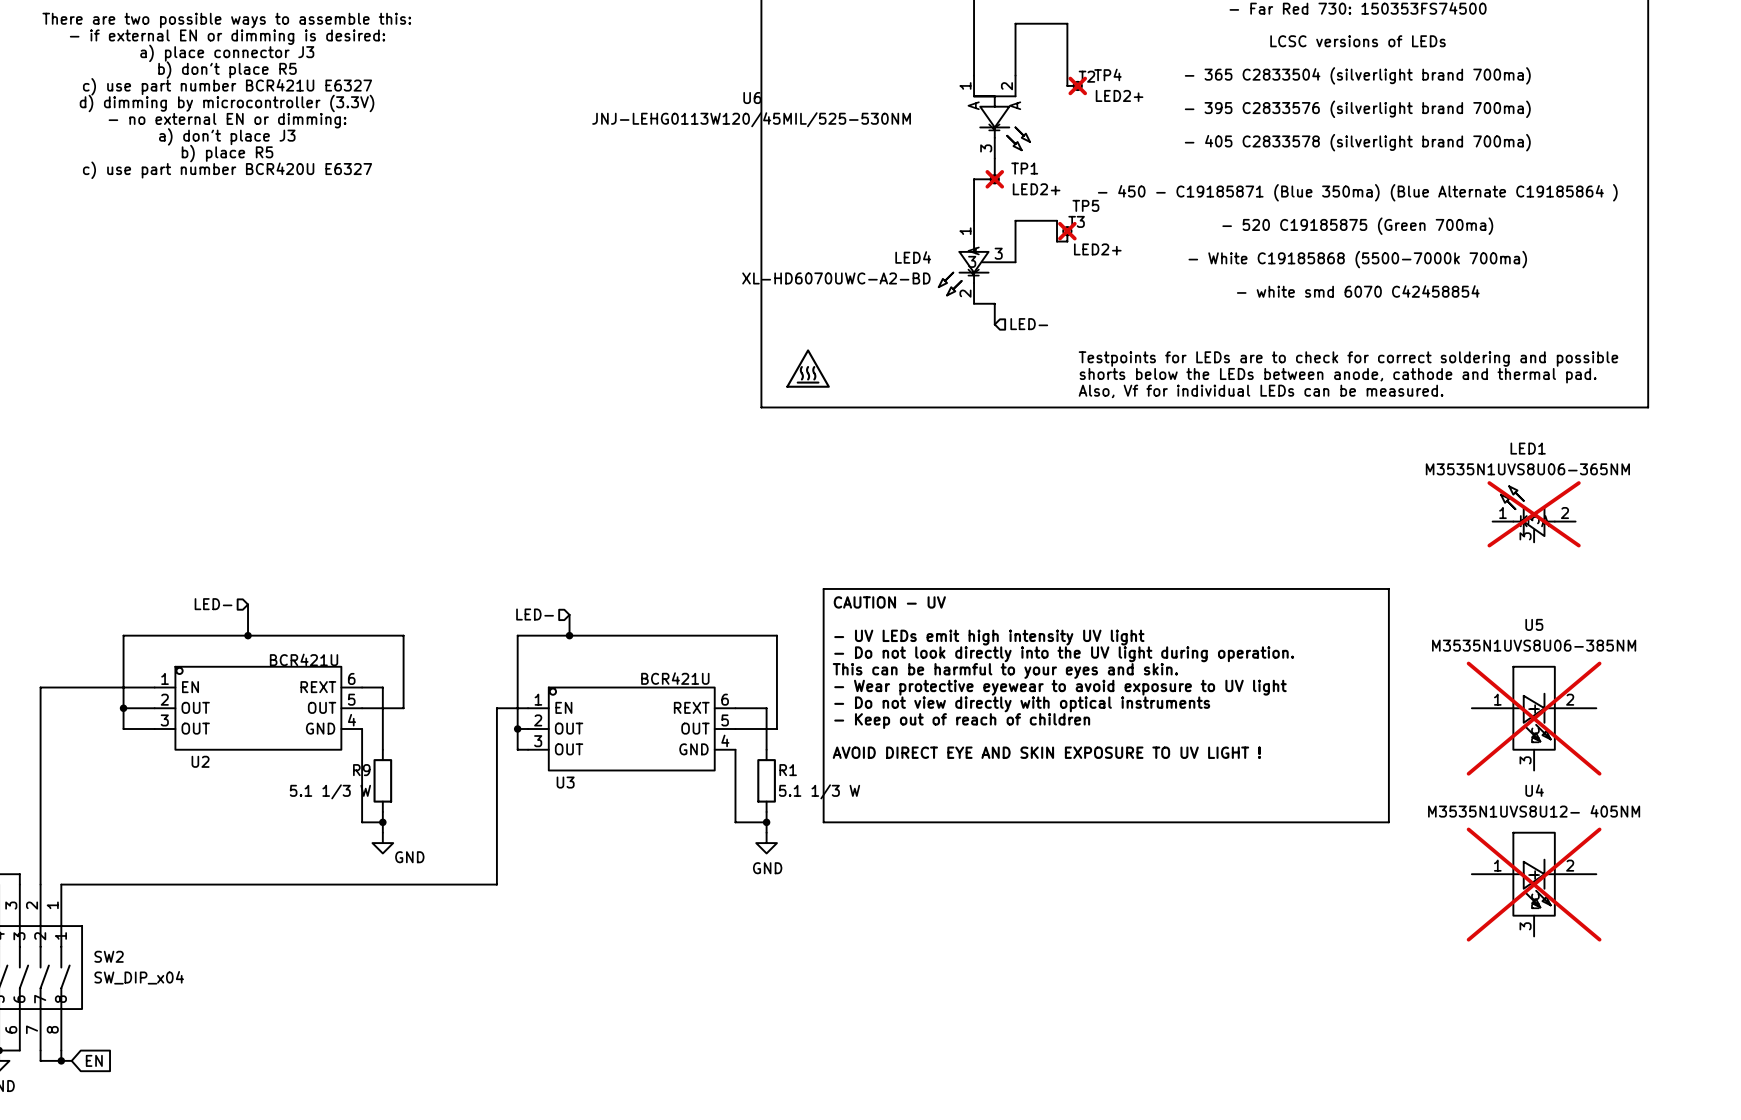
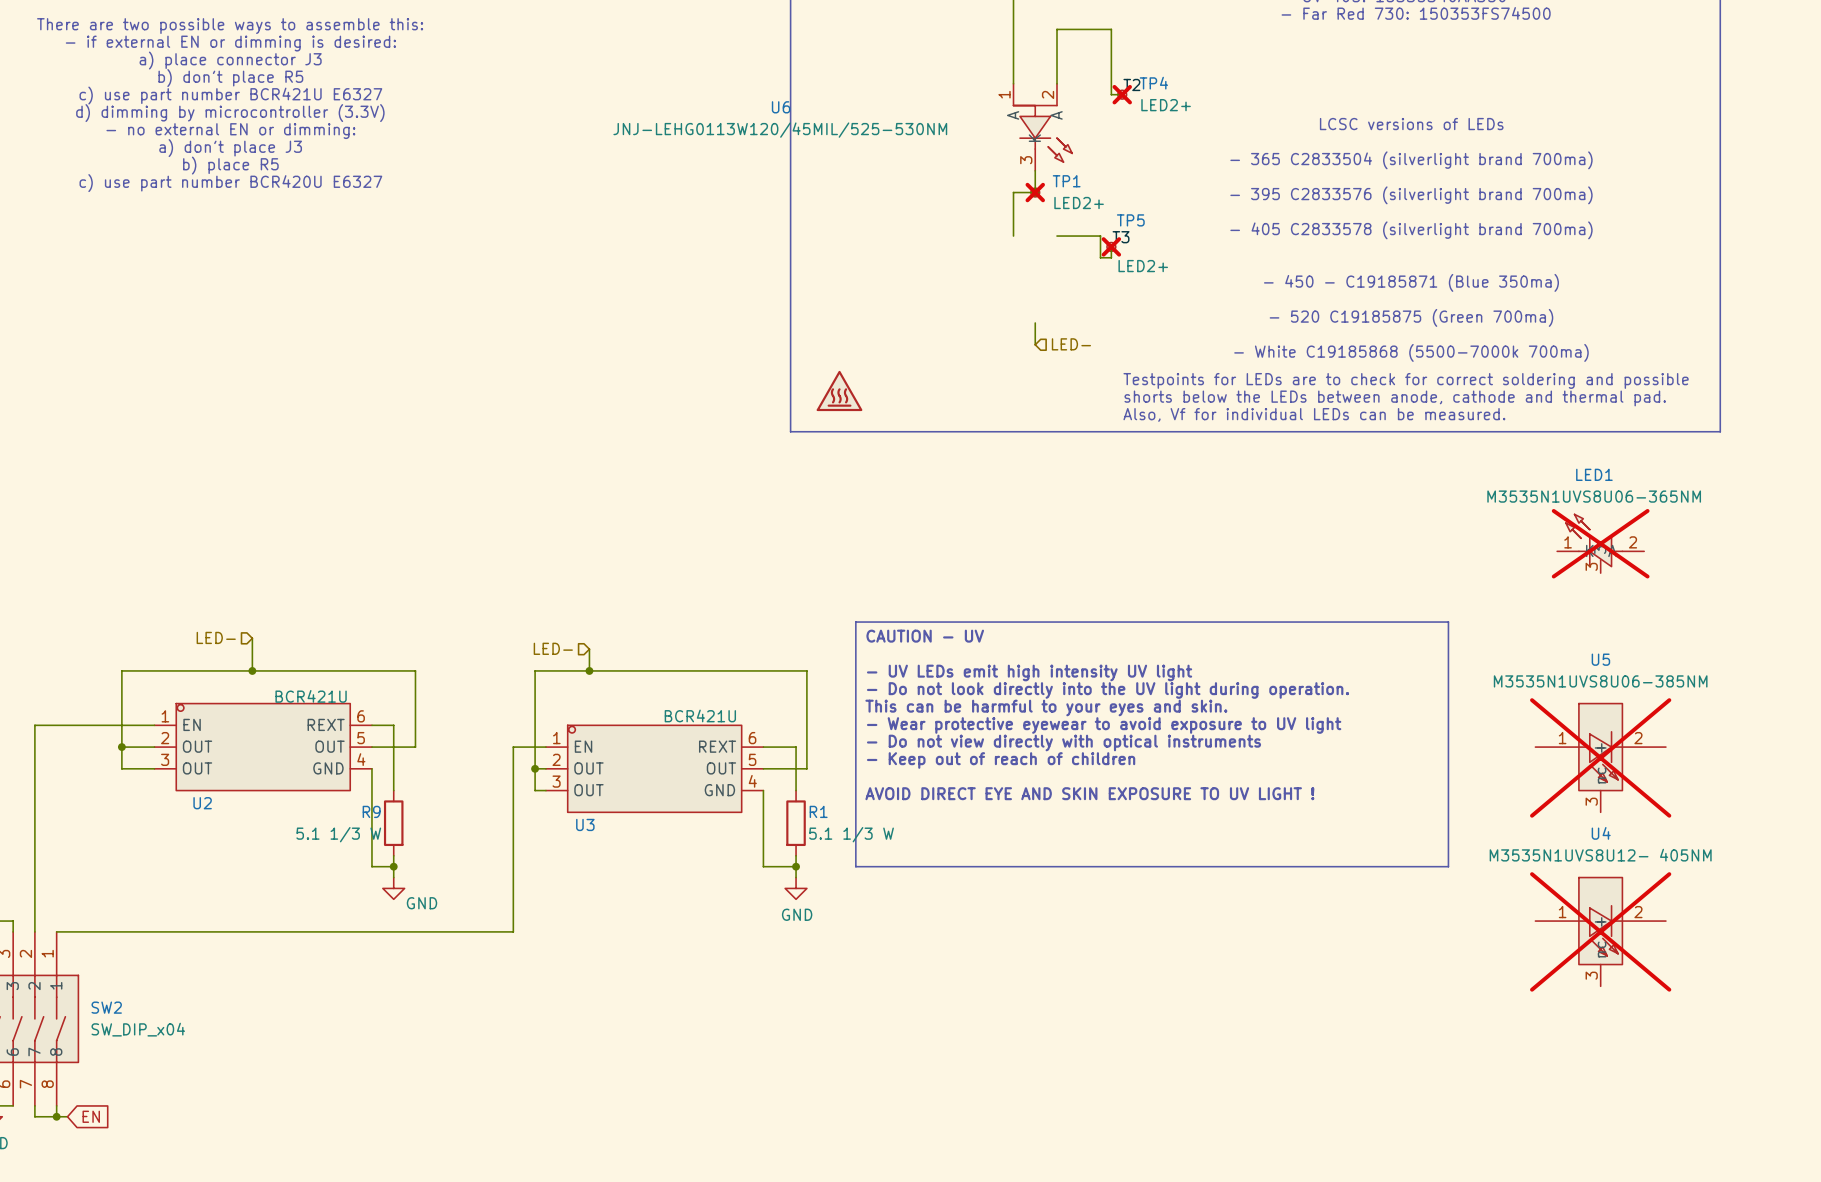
text position: LCSC versions of LEDs (1358, 41) -> LCSC versions of LEDs (1411, 124)
text position: - 365 C2833504 (silverlight brand 700ma) (1357, 75) -> - 365 C2833504 (silverlight brand 700ma) (1411, 160)
text position: - 395 C2833576 (silverlight brand 700ma) (1357, 109) -> - 395 C2833576 (silverlight brand 700ma) (1411, 195)
text position: - 405 C2833578 (silverlight brand 700ma) (1357, 142) -> - 405 C2833578 (silverlight brand 700ma) (1411, 230)
text: - 450 - C19185871 (Blue 350ma) (Blue Alternate C19185864 ) (1357, 192) -> none
wire: (1015, 220) (1015, 262) -> none
text position: - 520 C19185875 (Green 700ma) (1357, 226) -> - 520 C19185875 (Green 700ma) (1411, 317)
text position: - White C19185868 (5500-7000k 700ma) (1357, 259) -> - White C19185868 (5500-7000k 700ma) (1411, 352)
LED4: XL-HD6070UWC-A2-BD (977, 262) -> none
text: none -> - 450 - C19185871 (Blue 350ma) (1411, 282)
text: - white smd 6070 C42458854 (1358, 291) -> none
wire: (974, 303) (994, 303) -> none

